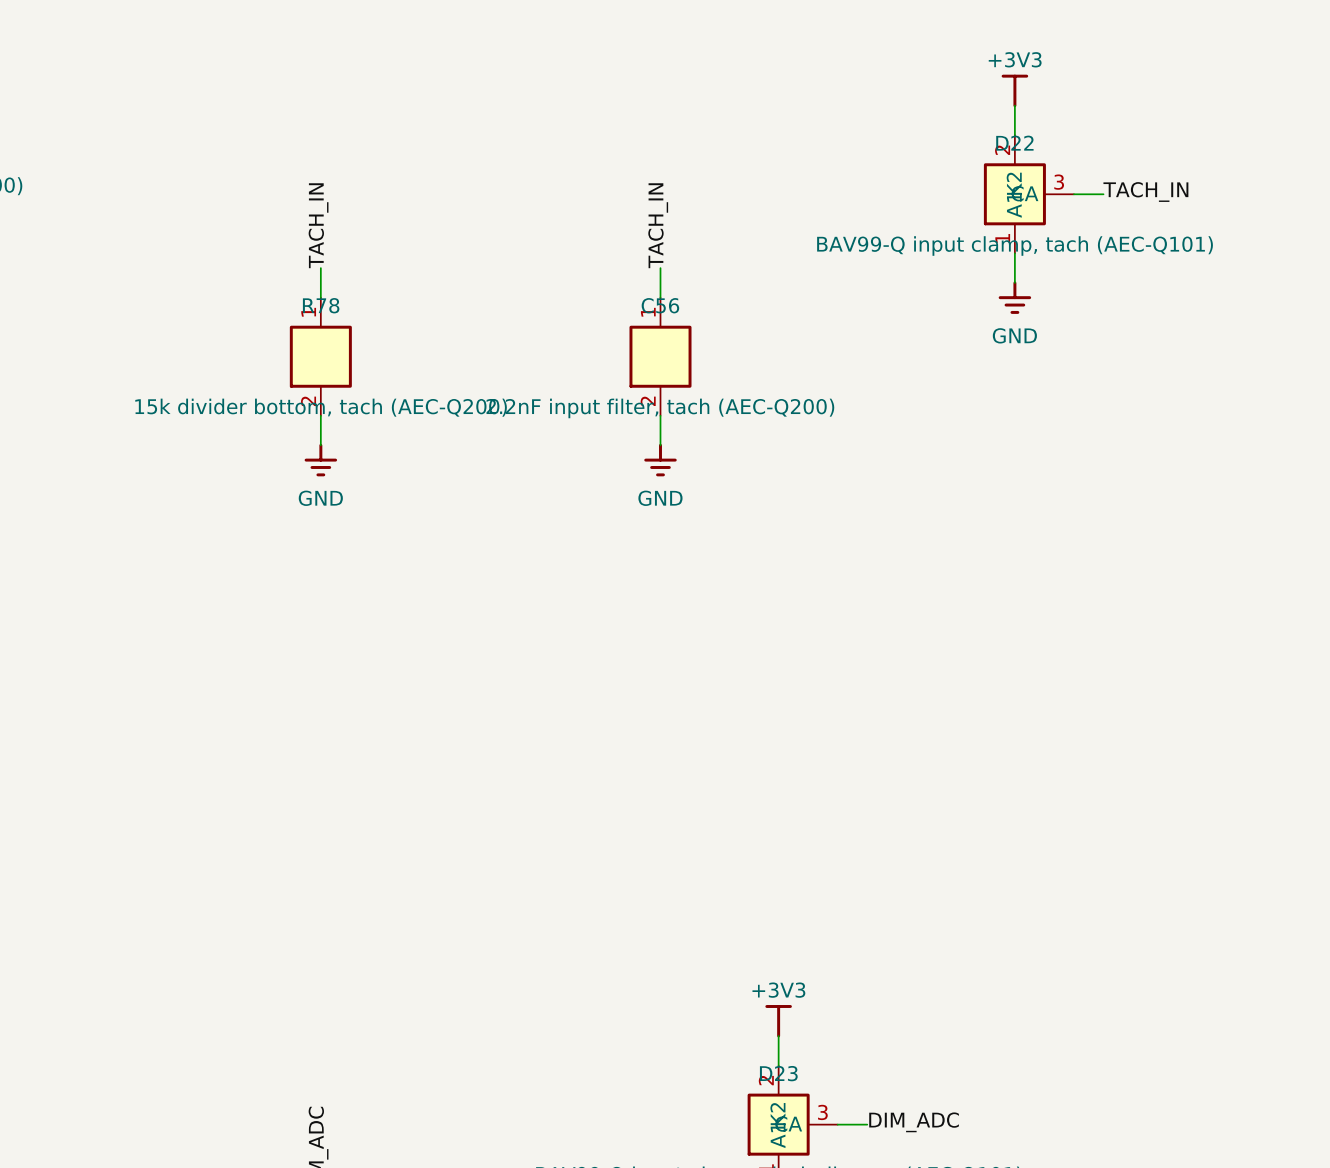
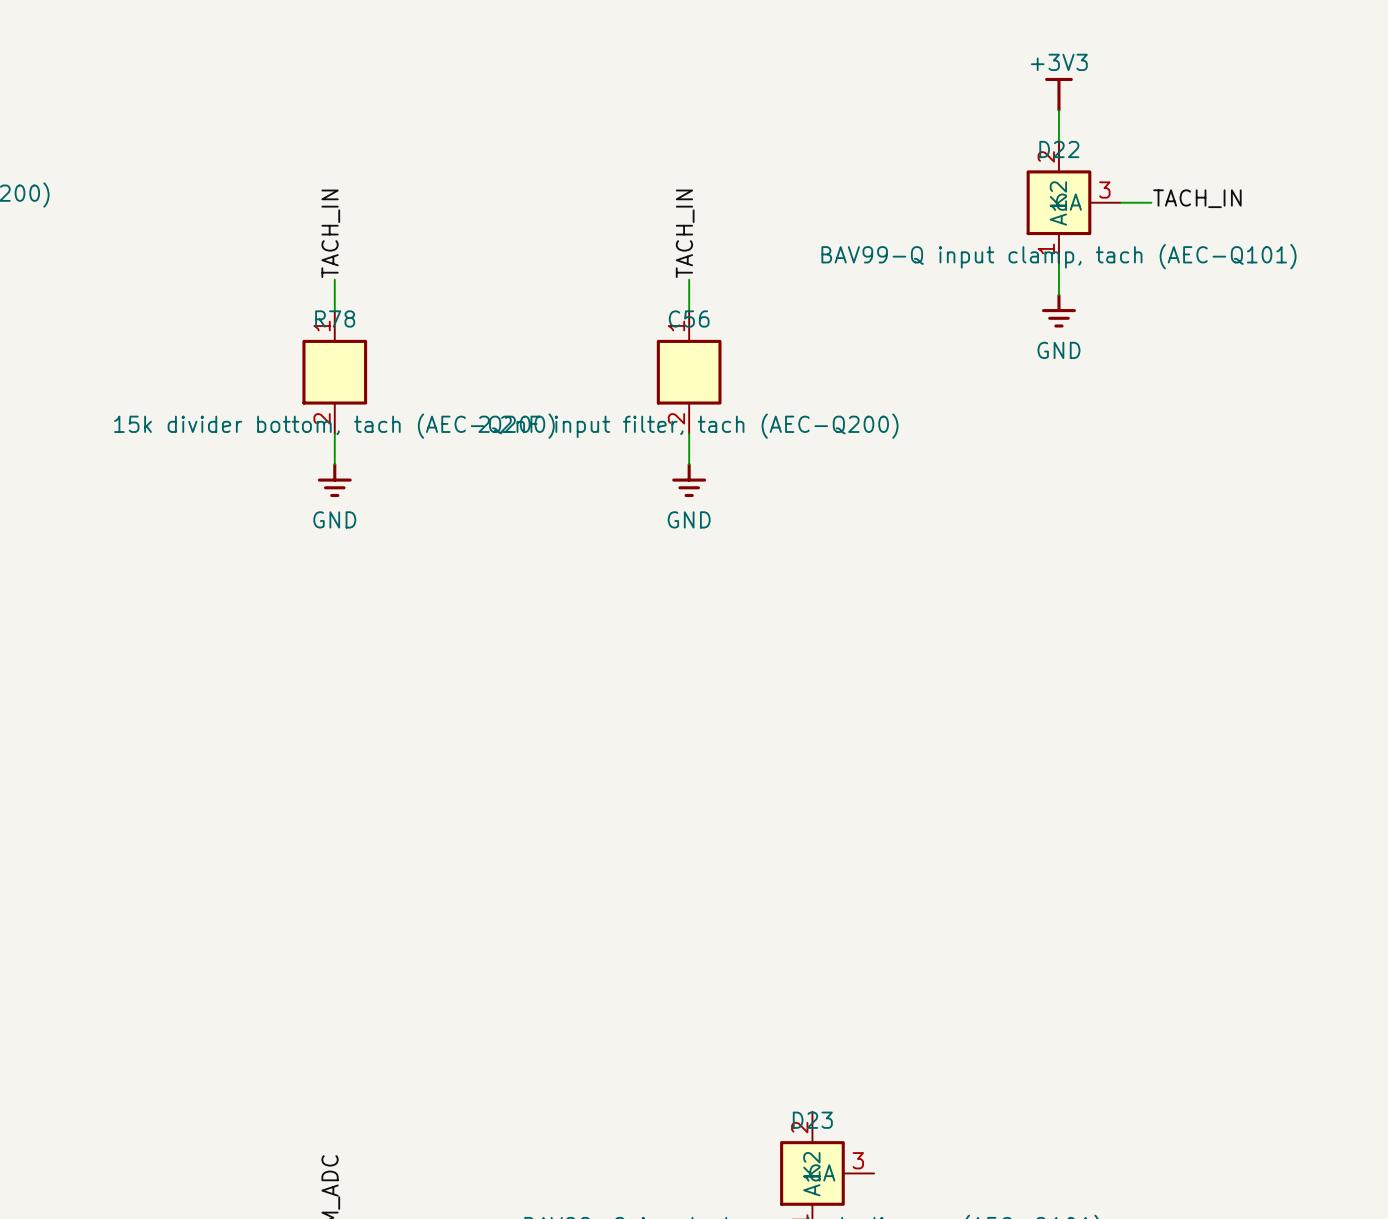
power symbol: +3V3 (778, 1021) -> none
wire: (778, 1036) (778, 1065) -> none
label: DIM_ADC (914, 1122) -> none
wire: (837, 1124) (867, 1124) -> none

